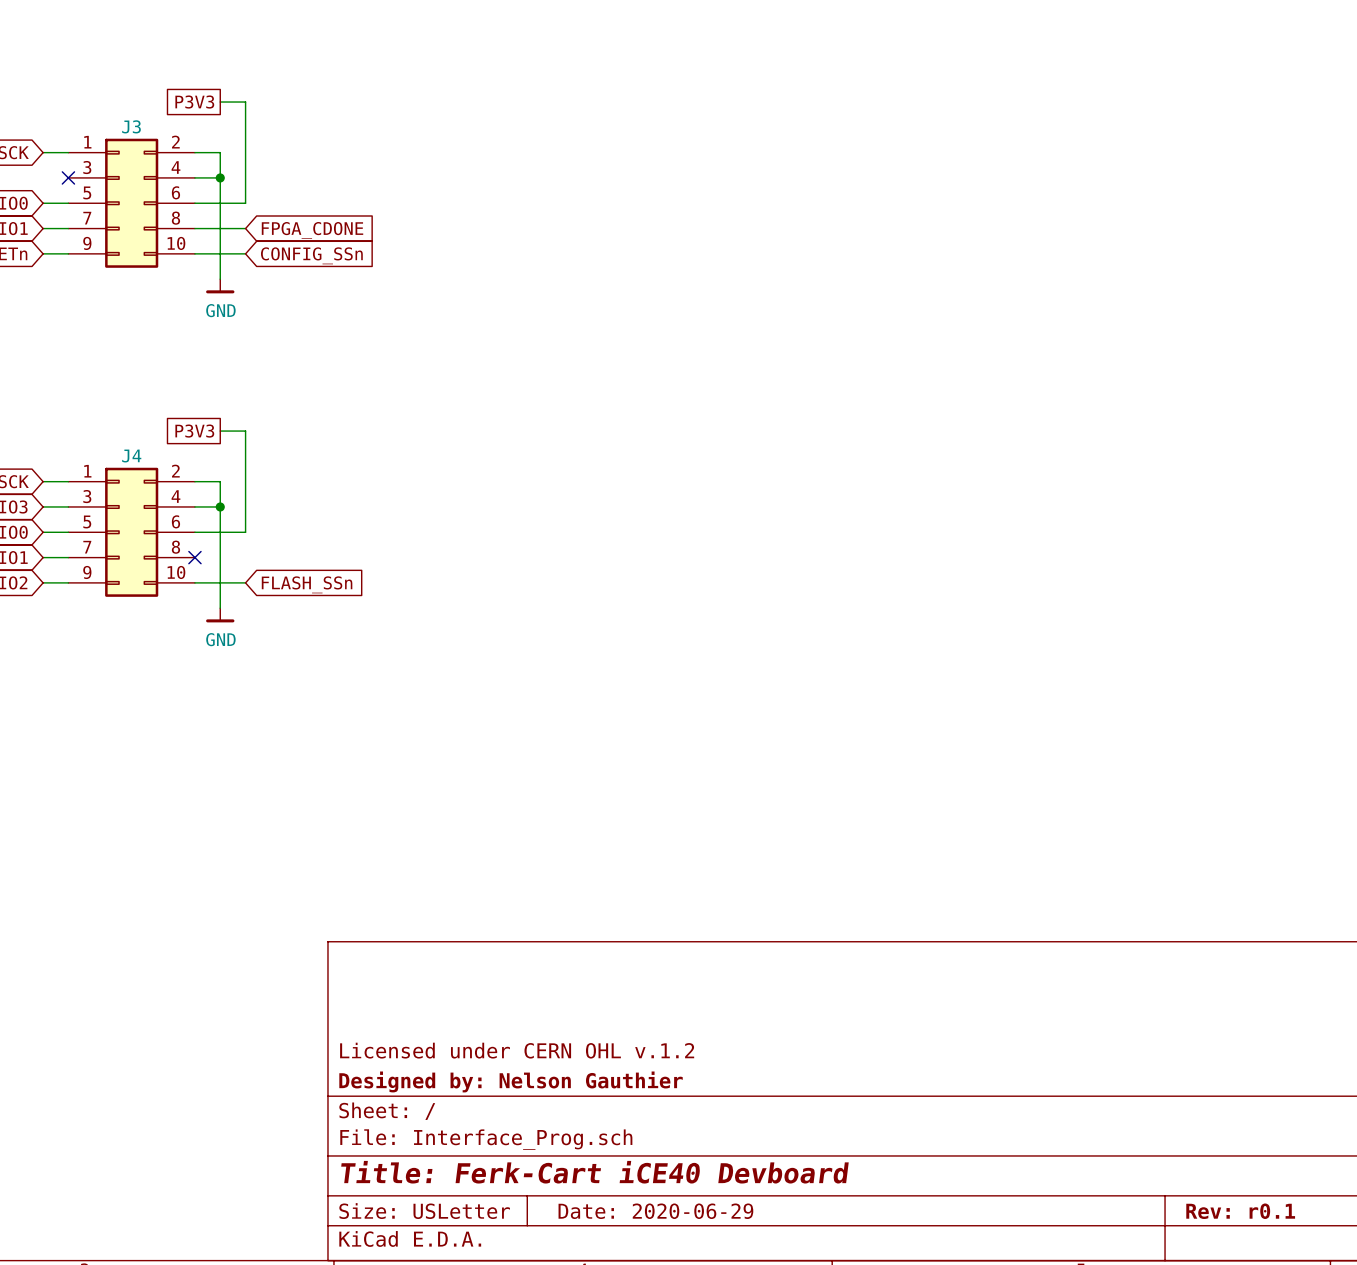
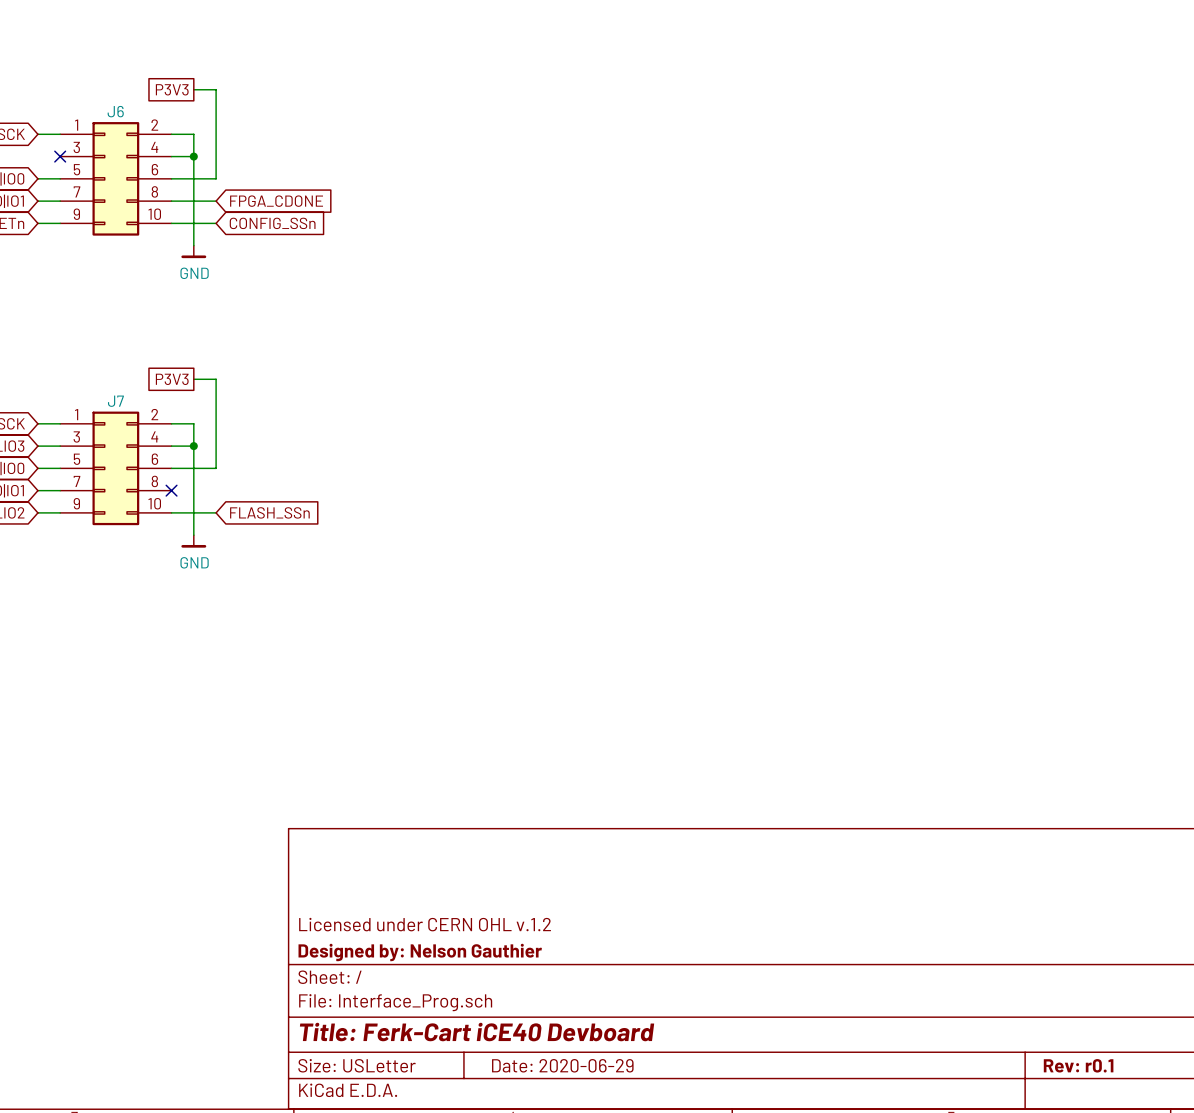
J3 name: J3 (131, 126) -> J6 (115, 111)
J4 name: J4 (131, 456) -> J7 (115, 401)

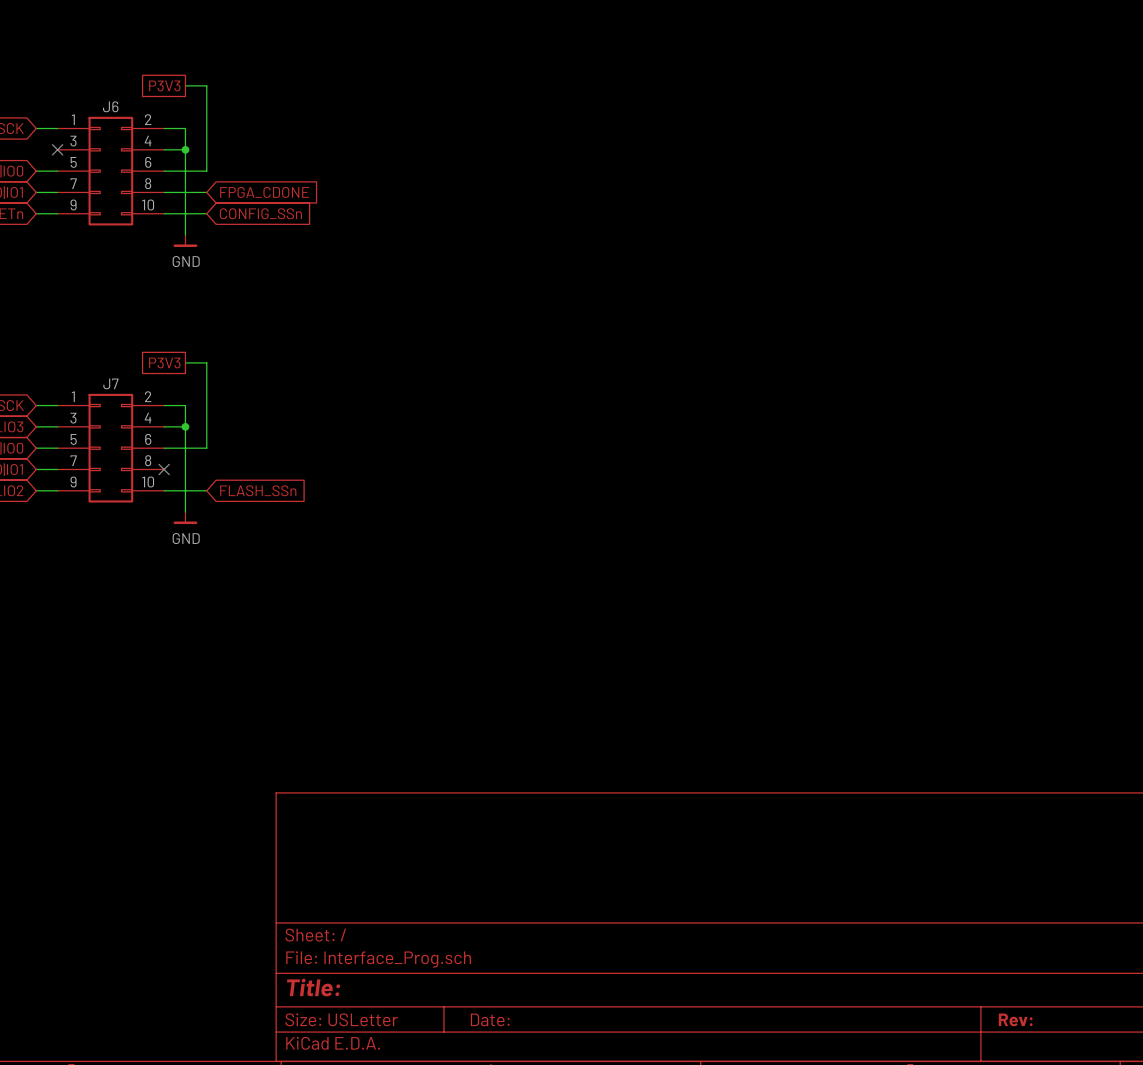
title block: Licensed under CERN OHL v.1.2 (425, 924) -> none
title block: Designed by: Nelson Gauthier (420, 952) -> none
title block: Title: Ferk-Cart iCE40 Devboard (477, 1032) -> Title: (313, 987)
title block: Date: 2020-06-29 (562, 1065) -> Date: (490, 1019)
title block: Rev: r0.1 (1078, 1065) -> Rev: (1015, 1019)

